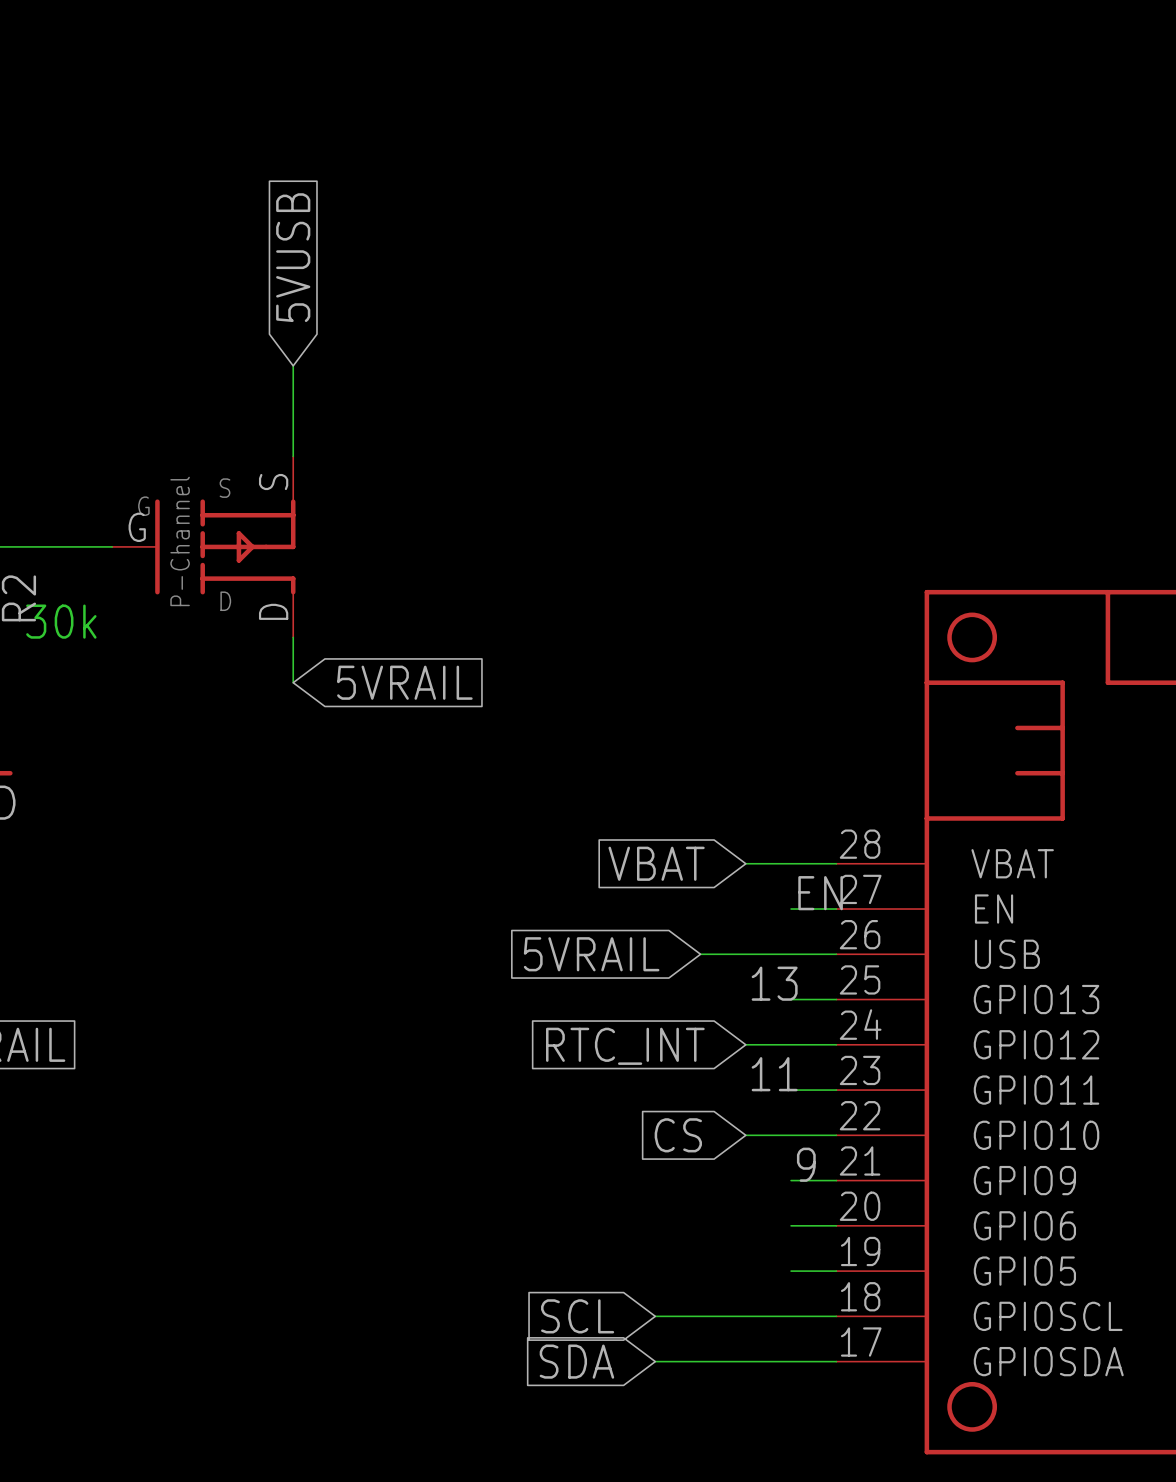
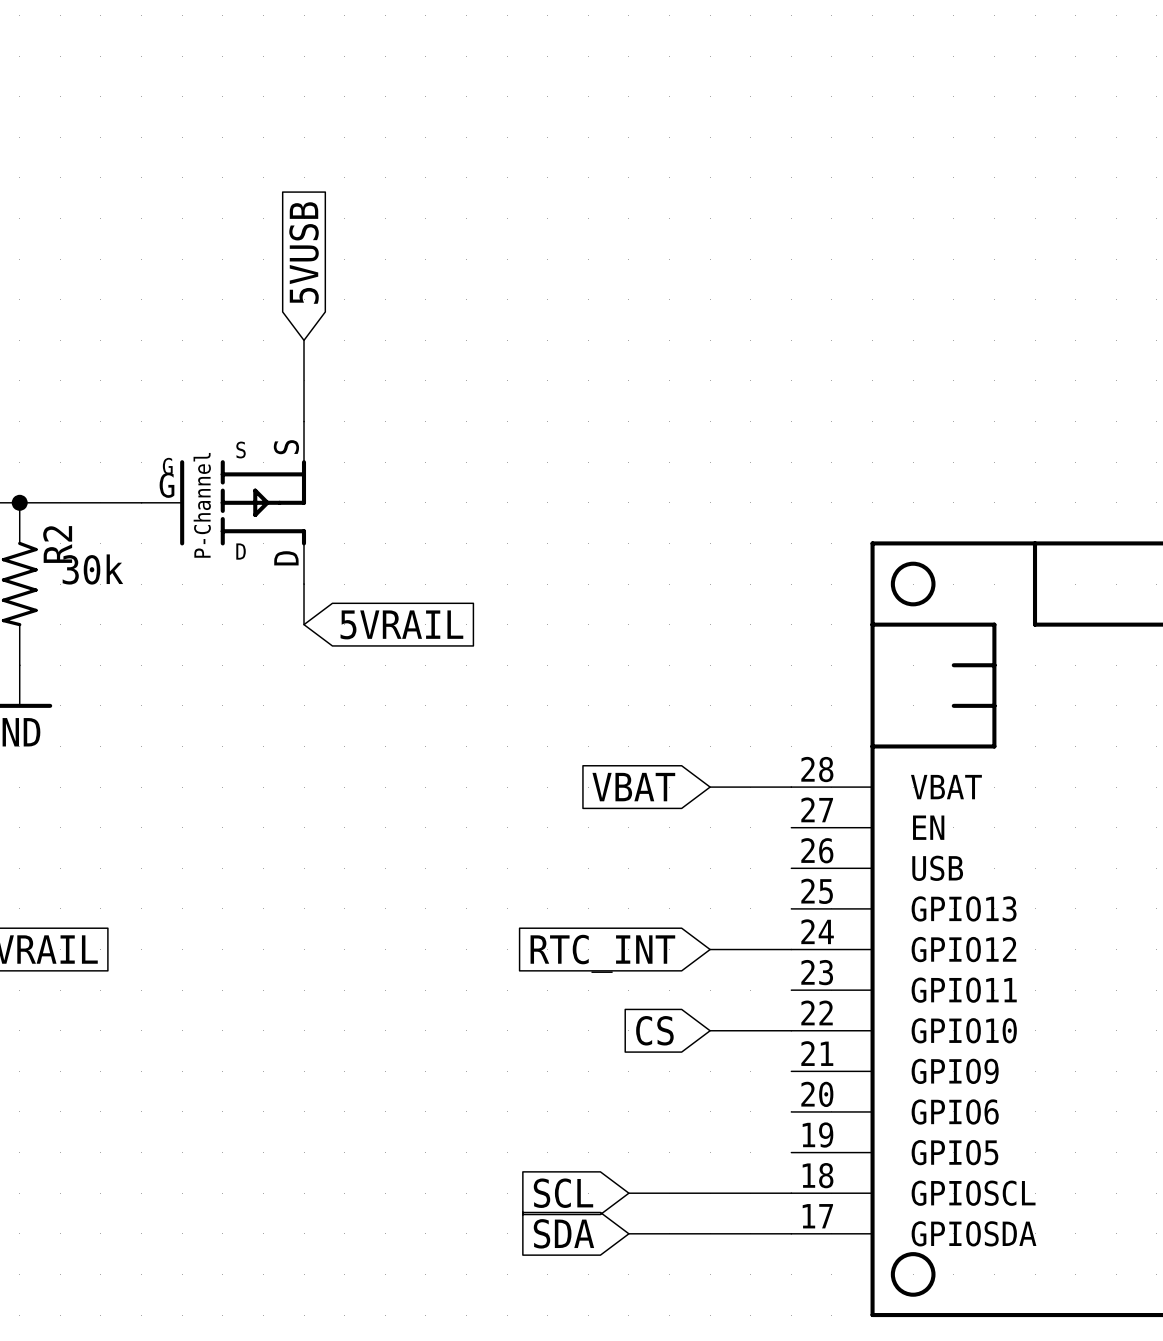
label: EN (820, 893) -> none
wire: (791, 909) (836, 909) -> none
global label: 5VRAIL (591, 954) -> none
wire: (700, 954) (836, 954) -> none
label: 13 (774, 983) -> none
wire: (791, 999) (836, 999) -> none
label: 11 (774, 1074) -> none
wire: (791, 1090) (836, 1090) -> none
label: 9 (806, 1164) -> none
wire: (791, 1180) (836, 1180) -> none
wire: (791, 1225) (836, 1225) -> none
wire: (791, 1271) (836, 1271) -> none

